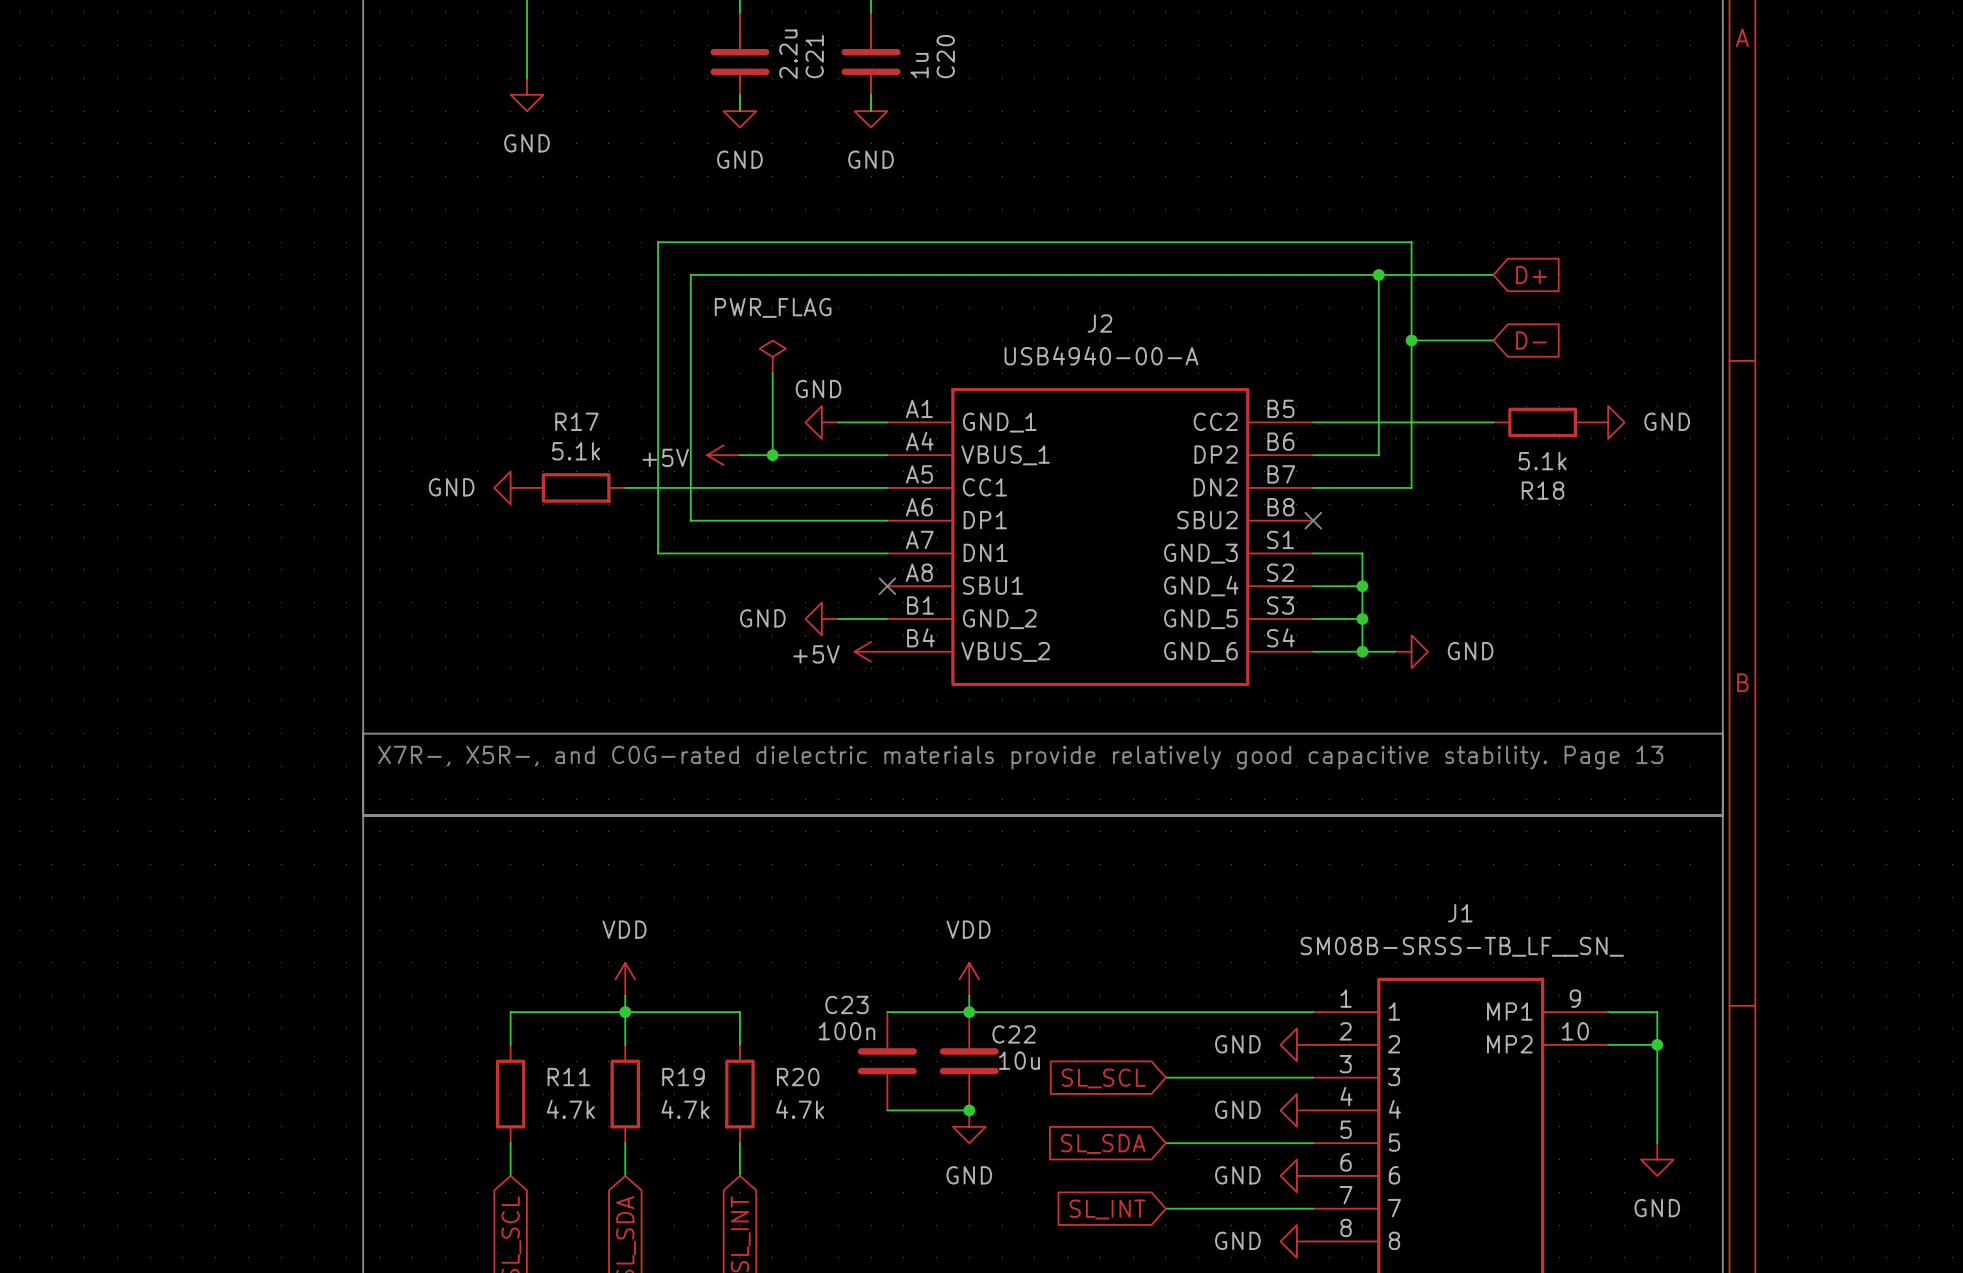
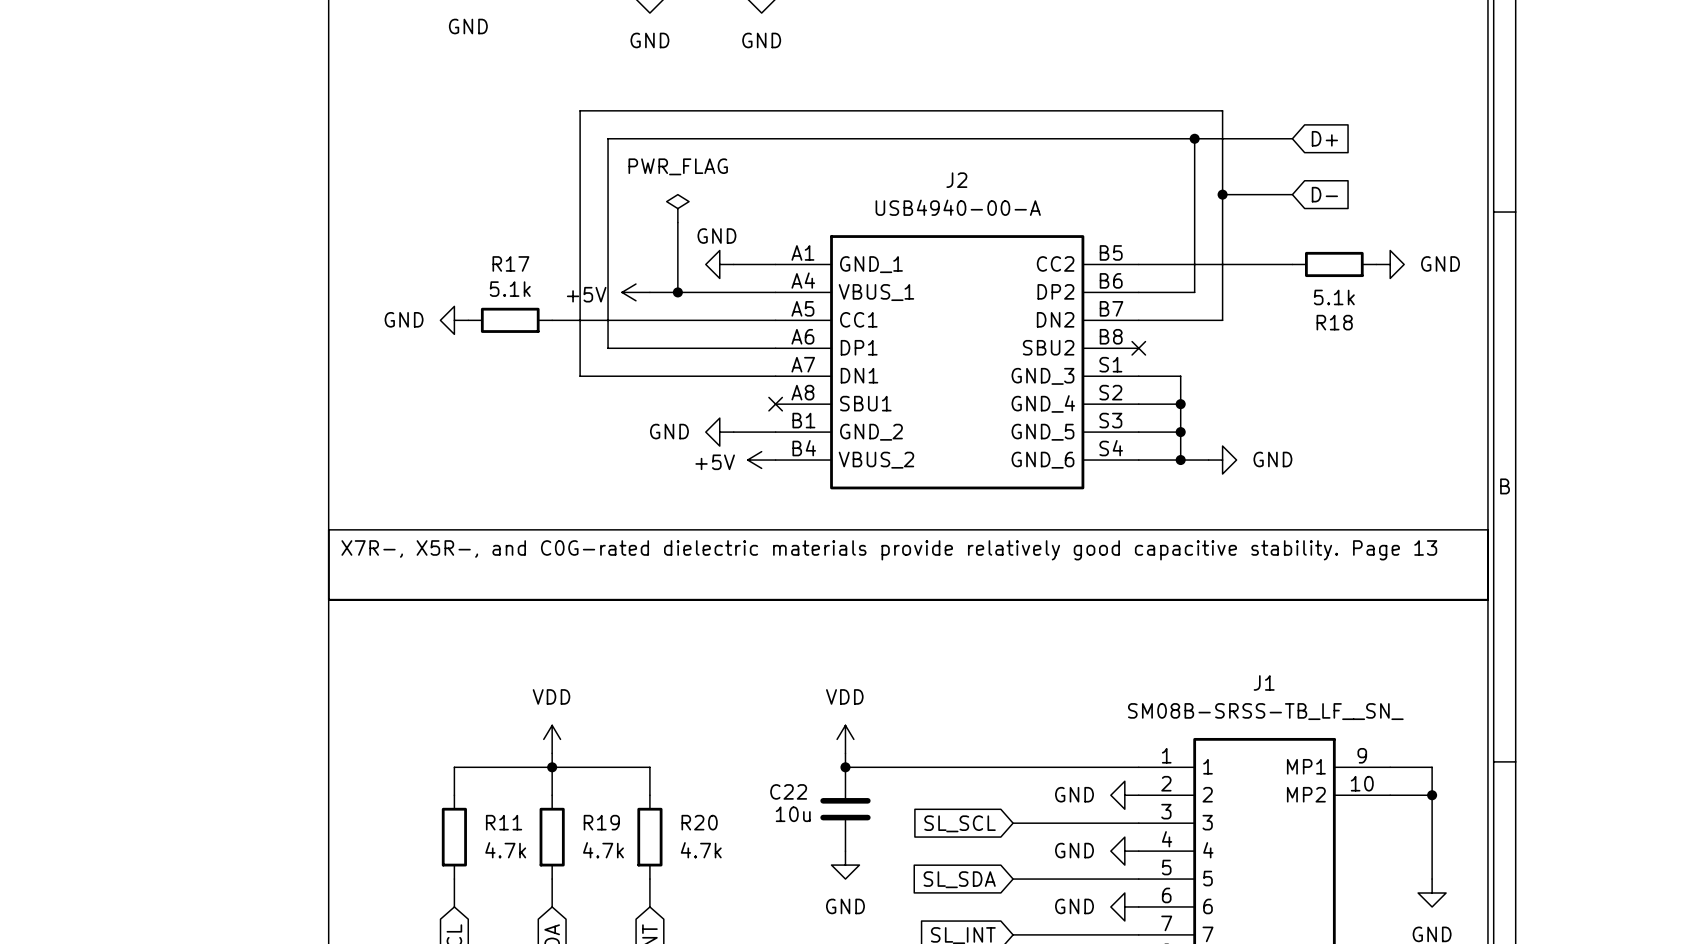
wire: (887, 1012) (969, 1012) -> none
C22 name position: C22 (1014, 1034) -> C22 (788, 791)
C22 value position: 10u (1019, 1060) -> 10u (793, 814)
C23: 100n (887, 1061) -> none
wire: (887, 1110) (969, 1110) -> none
junction: (969, 1110) -> none

